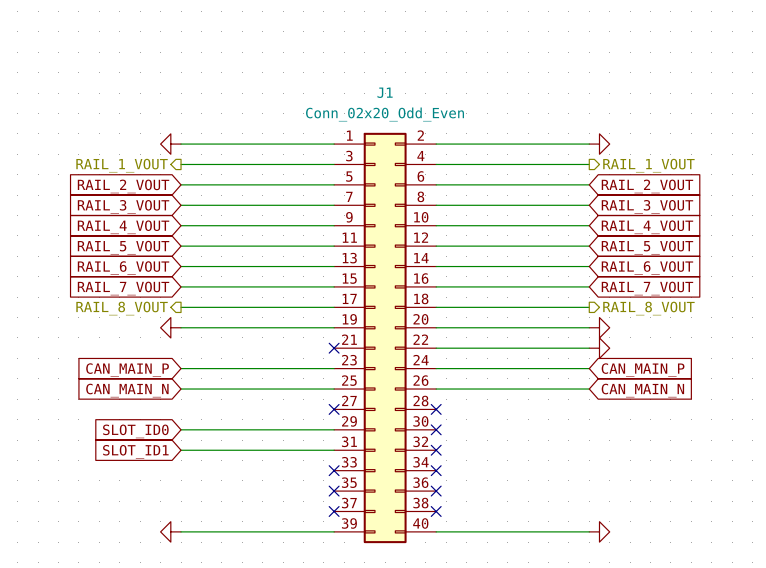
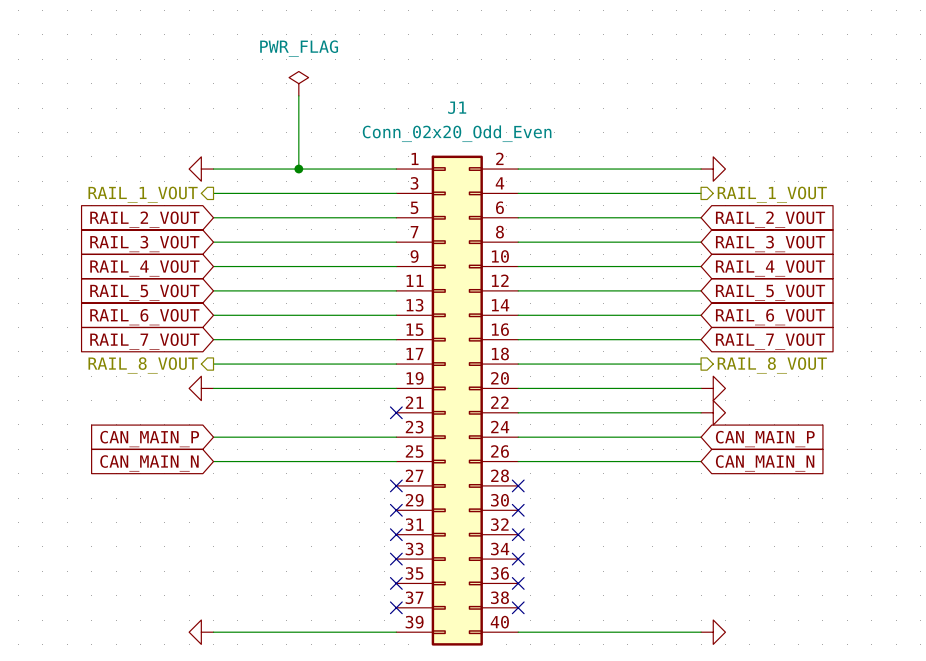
power symbol: none -> PWR_FLAG (298, 83)
wire: none -> (298, 95) (298, 169)
junction: none -> (298, 169)
wire: (181, 429) (334, 429) -> none
no-connect mark: none -> (396, 510)
global label: SLOT_ID0 (135, 431) -> none
wire: (181, 450) (334, 450) -> none
no-connect mark: none -> (396, 534)
global label: SLOT_ID1 (135, 451) -> none

